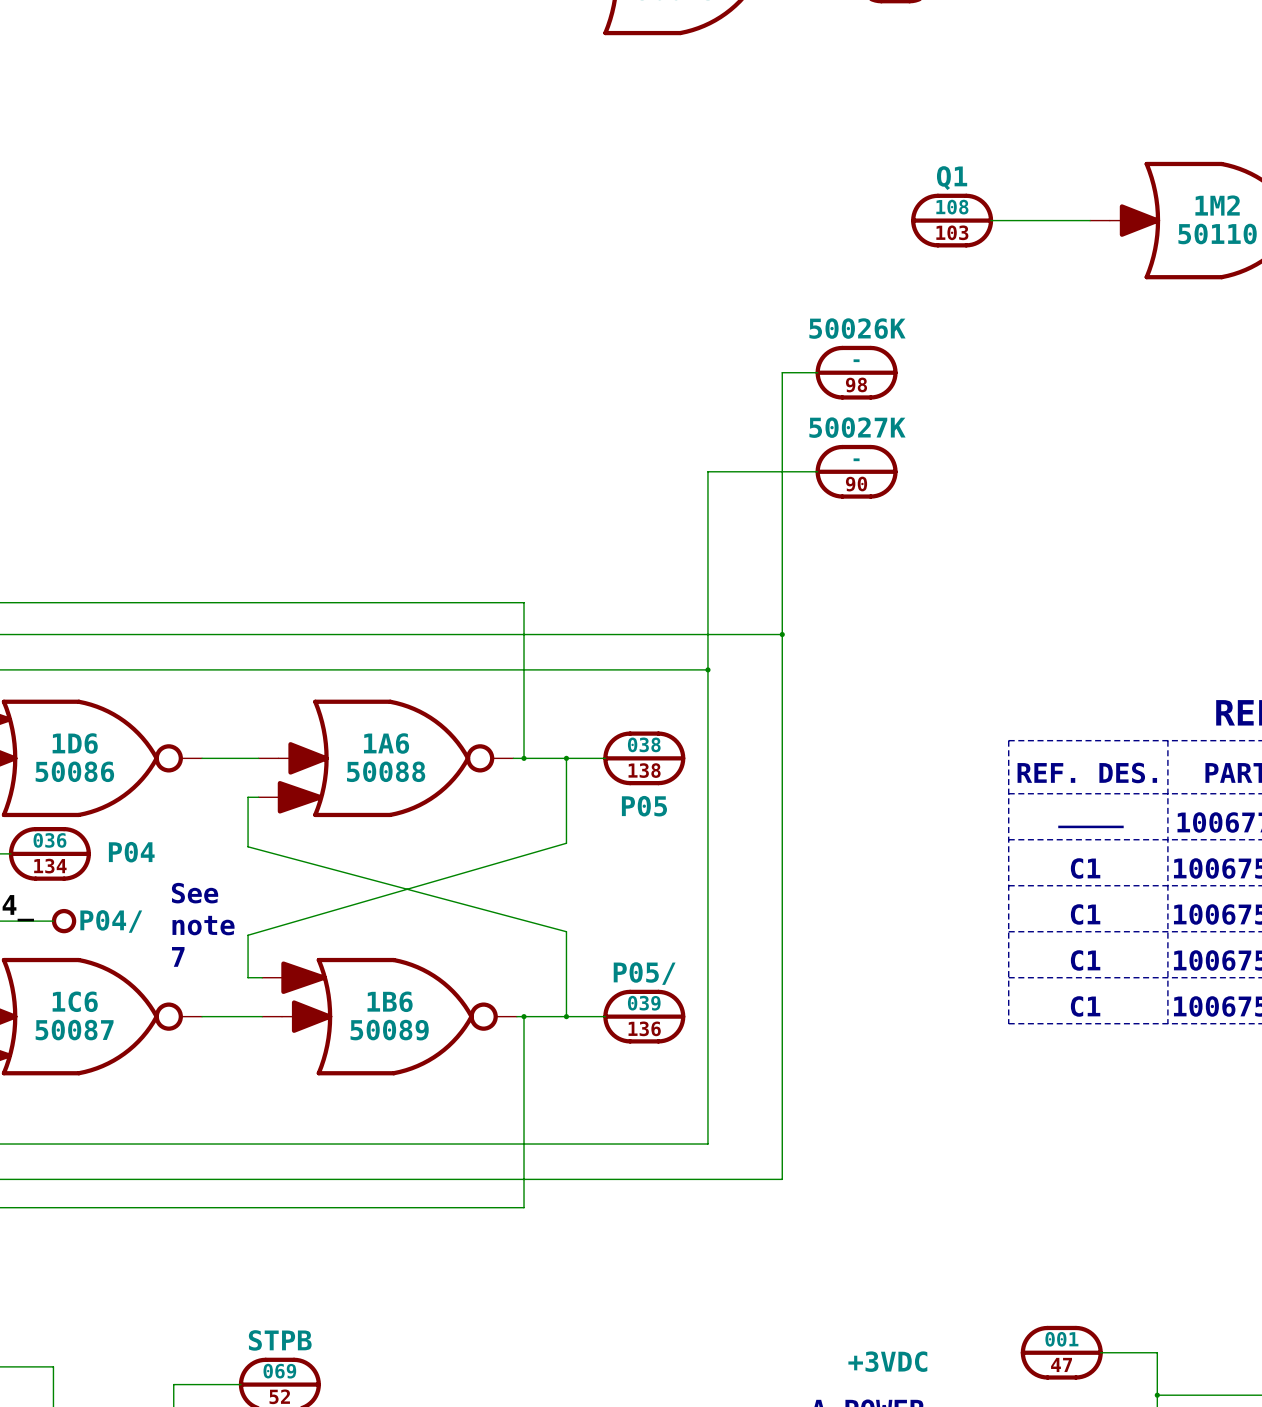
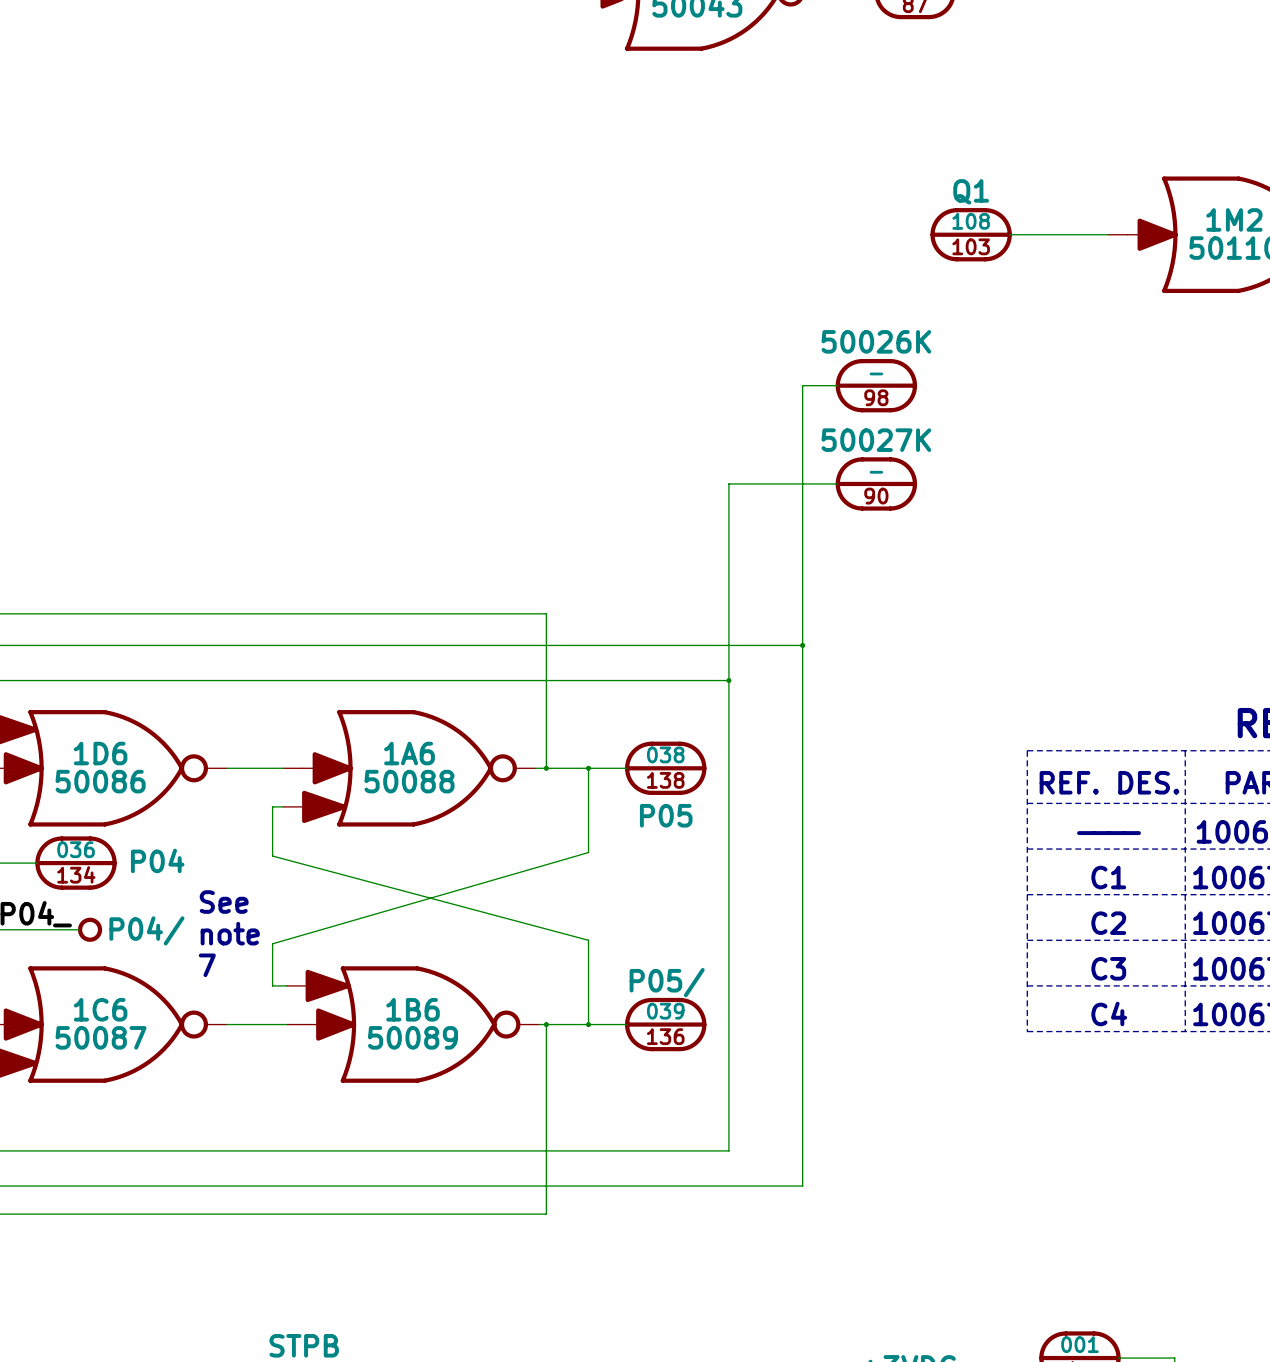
text: C1 (1085, 914) -> C2 (1108, 923)
text: C1 (1085, 960) -> C3 (1108, 968)
text: C1 (1085, 1006) -> C4 (1109, 1013)

